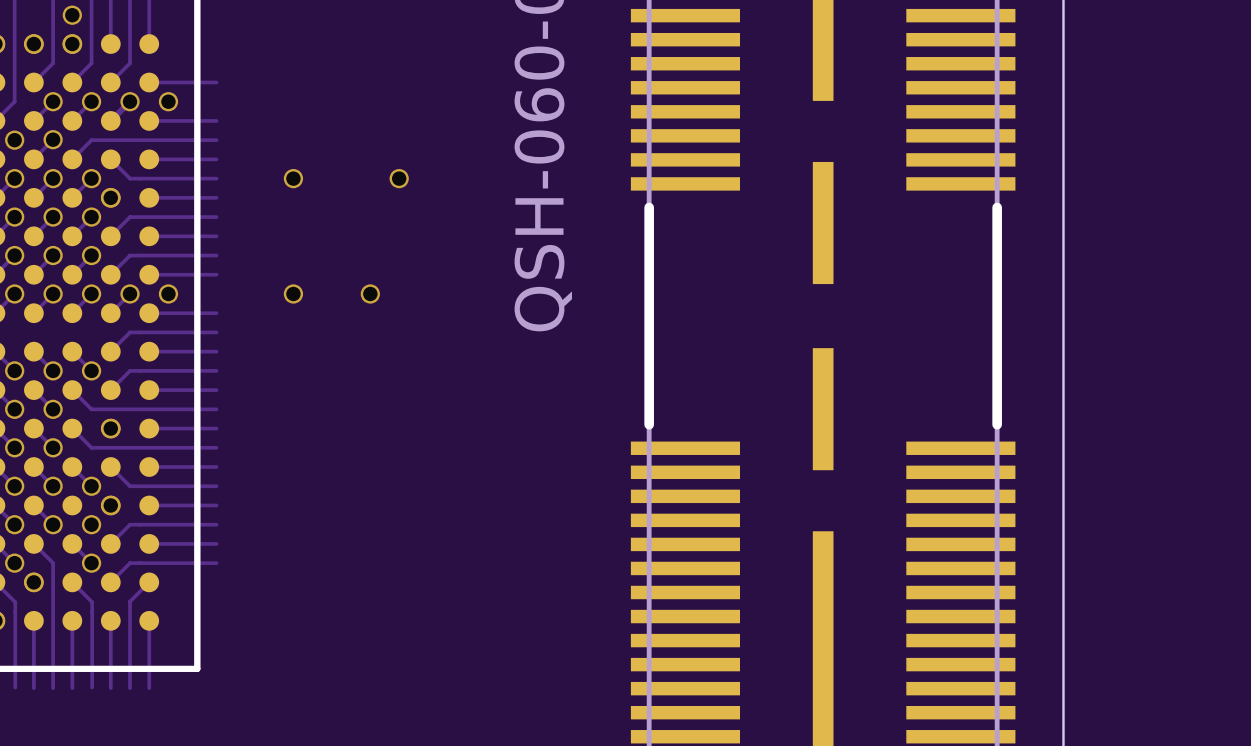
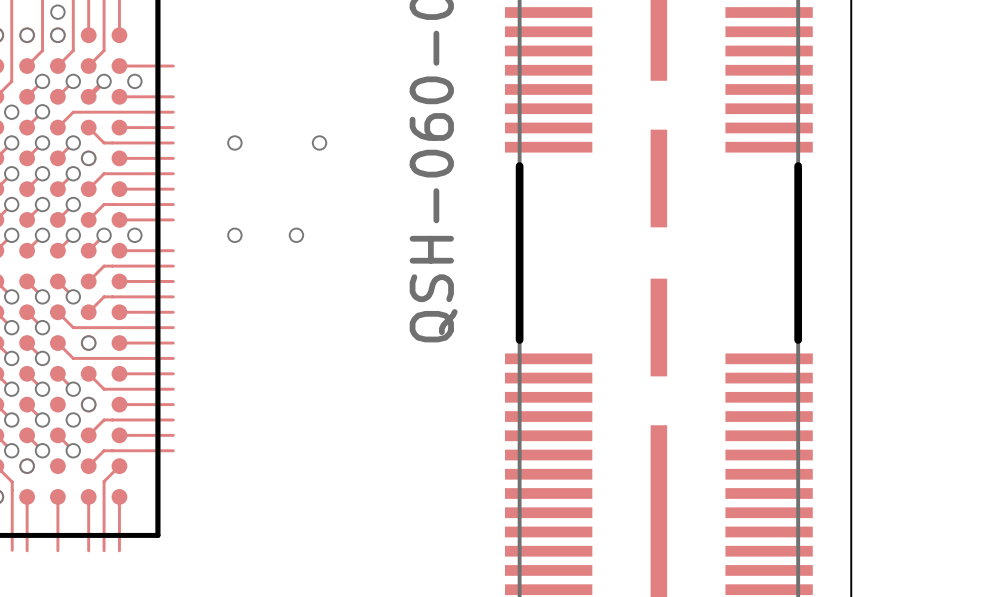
track: (53, 563) (53, 688) -> none
via: none -> (42, 450)
track: (72, 582) (92, 602) (92, 687) -> none

